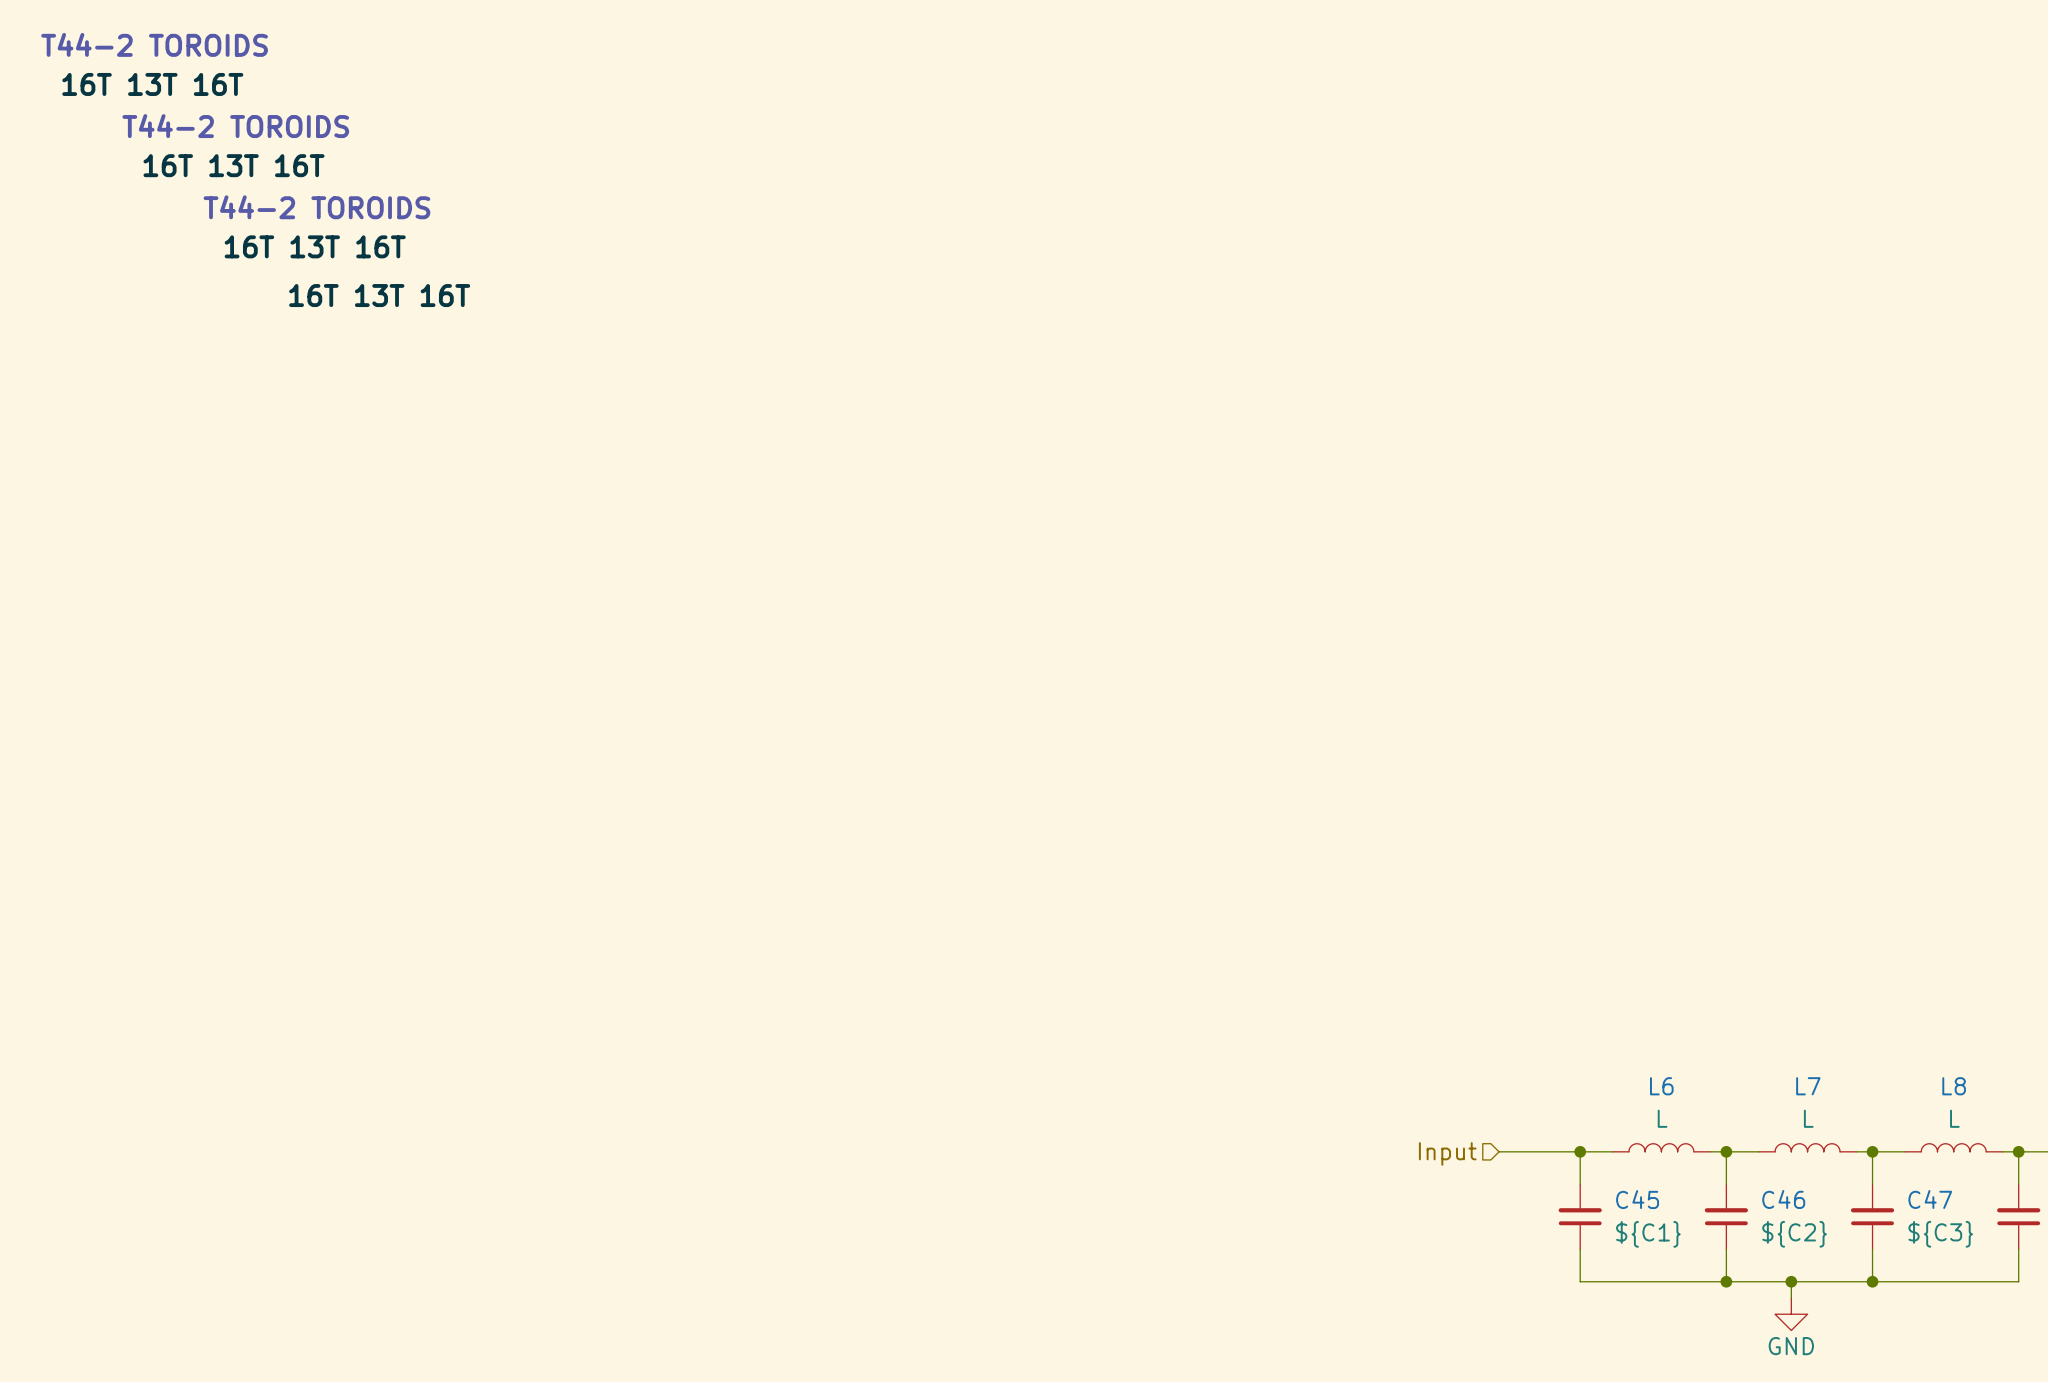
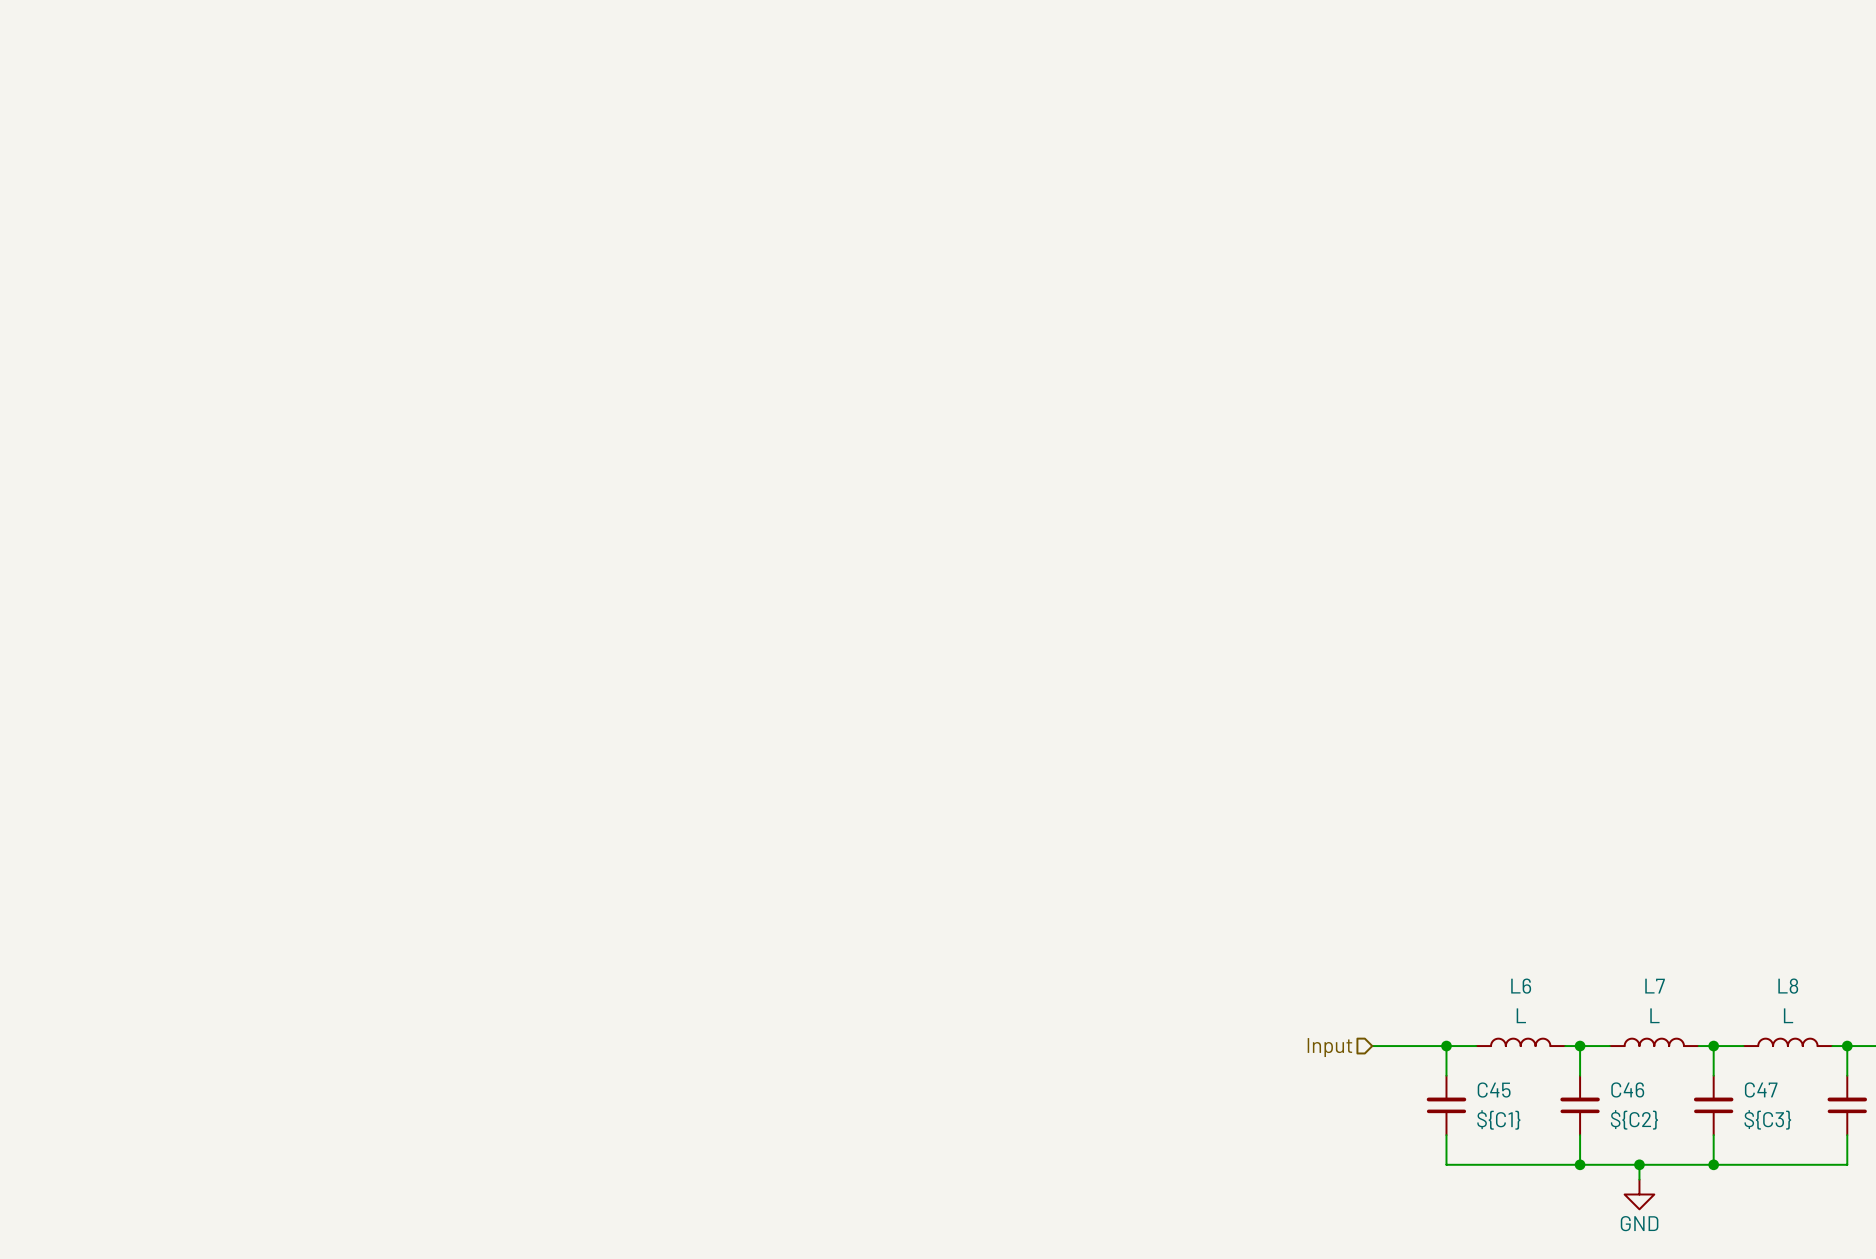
text: T44-2 TOROIDS (154, 44) -> none
label: 16T 13T 16T (152, 84) -> none
text: T44-2 TOROIDS (235, 126) -> none
label: 16T 13T 16T (234, 165) -> none
text: T44-2 TOROIDS (316, 207) -> none
label: 16T 13T 16T (315, 246) -> none
label: 16T 13T 16T (379, 295) -> none

